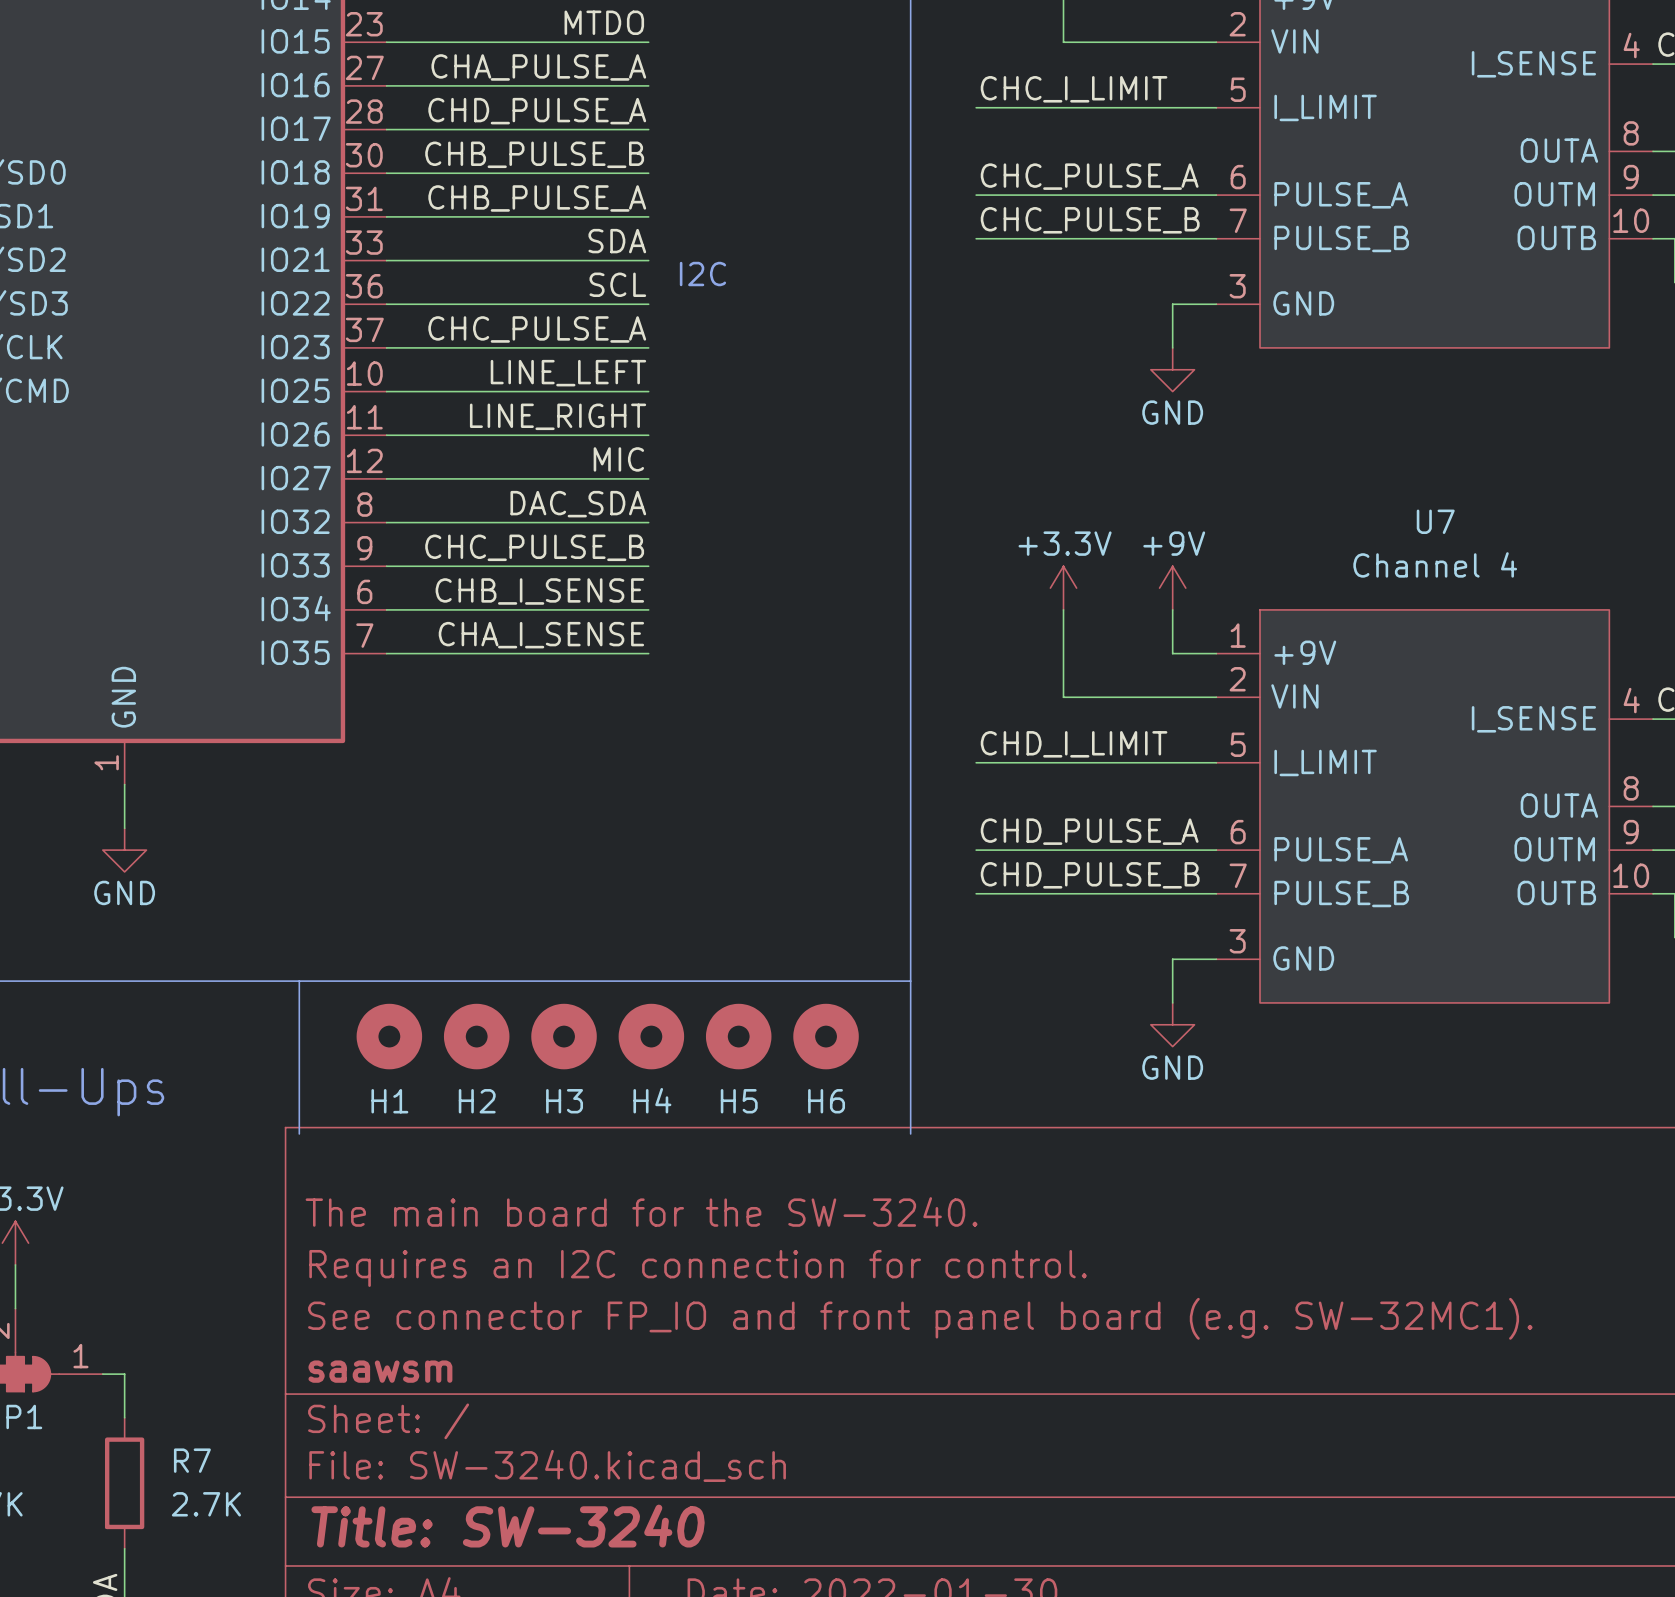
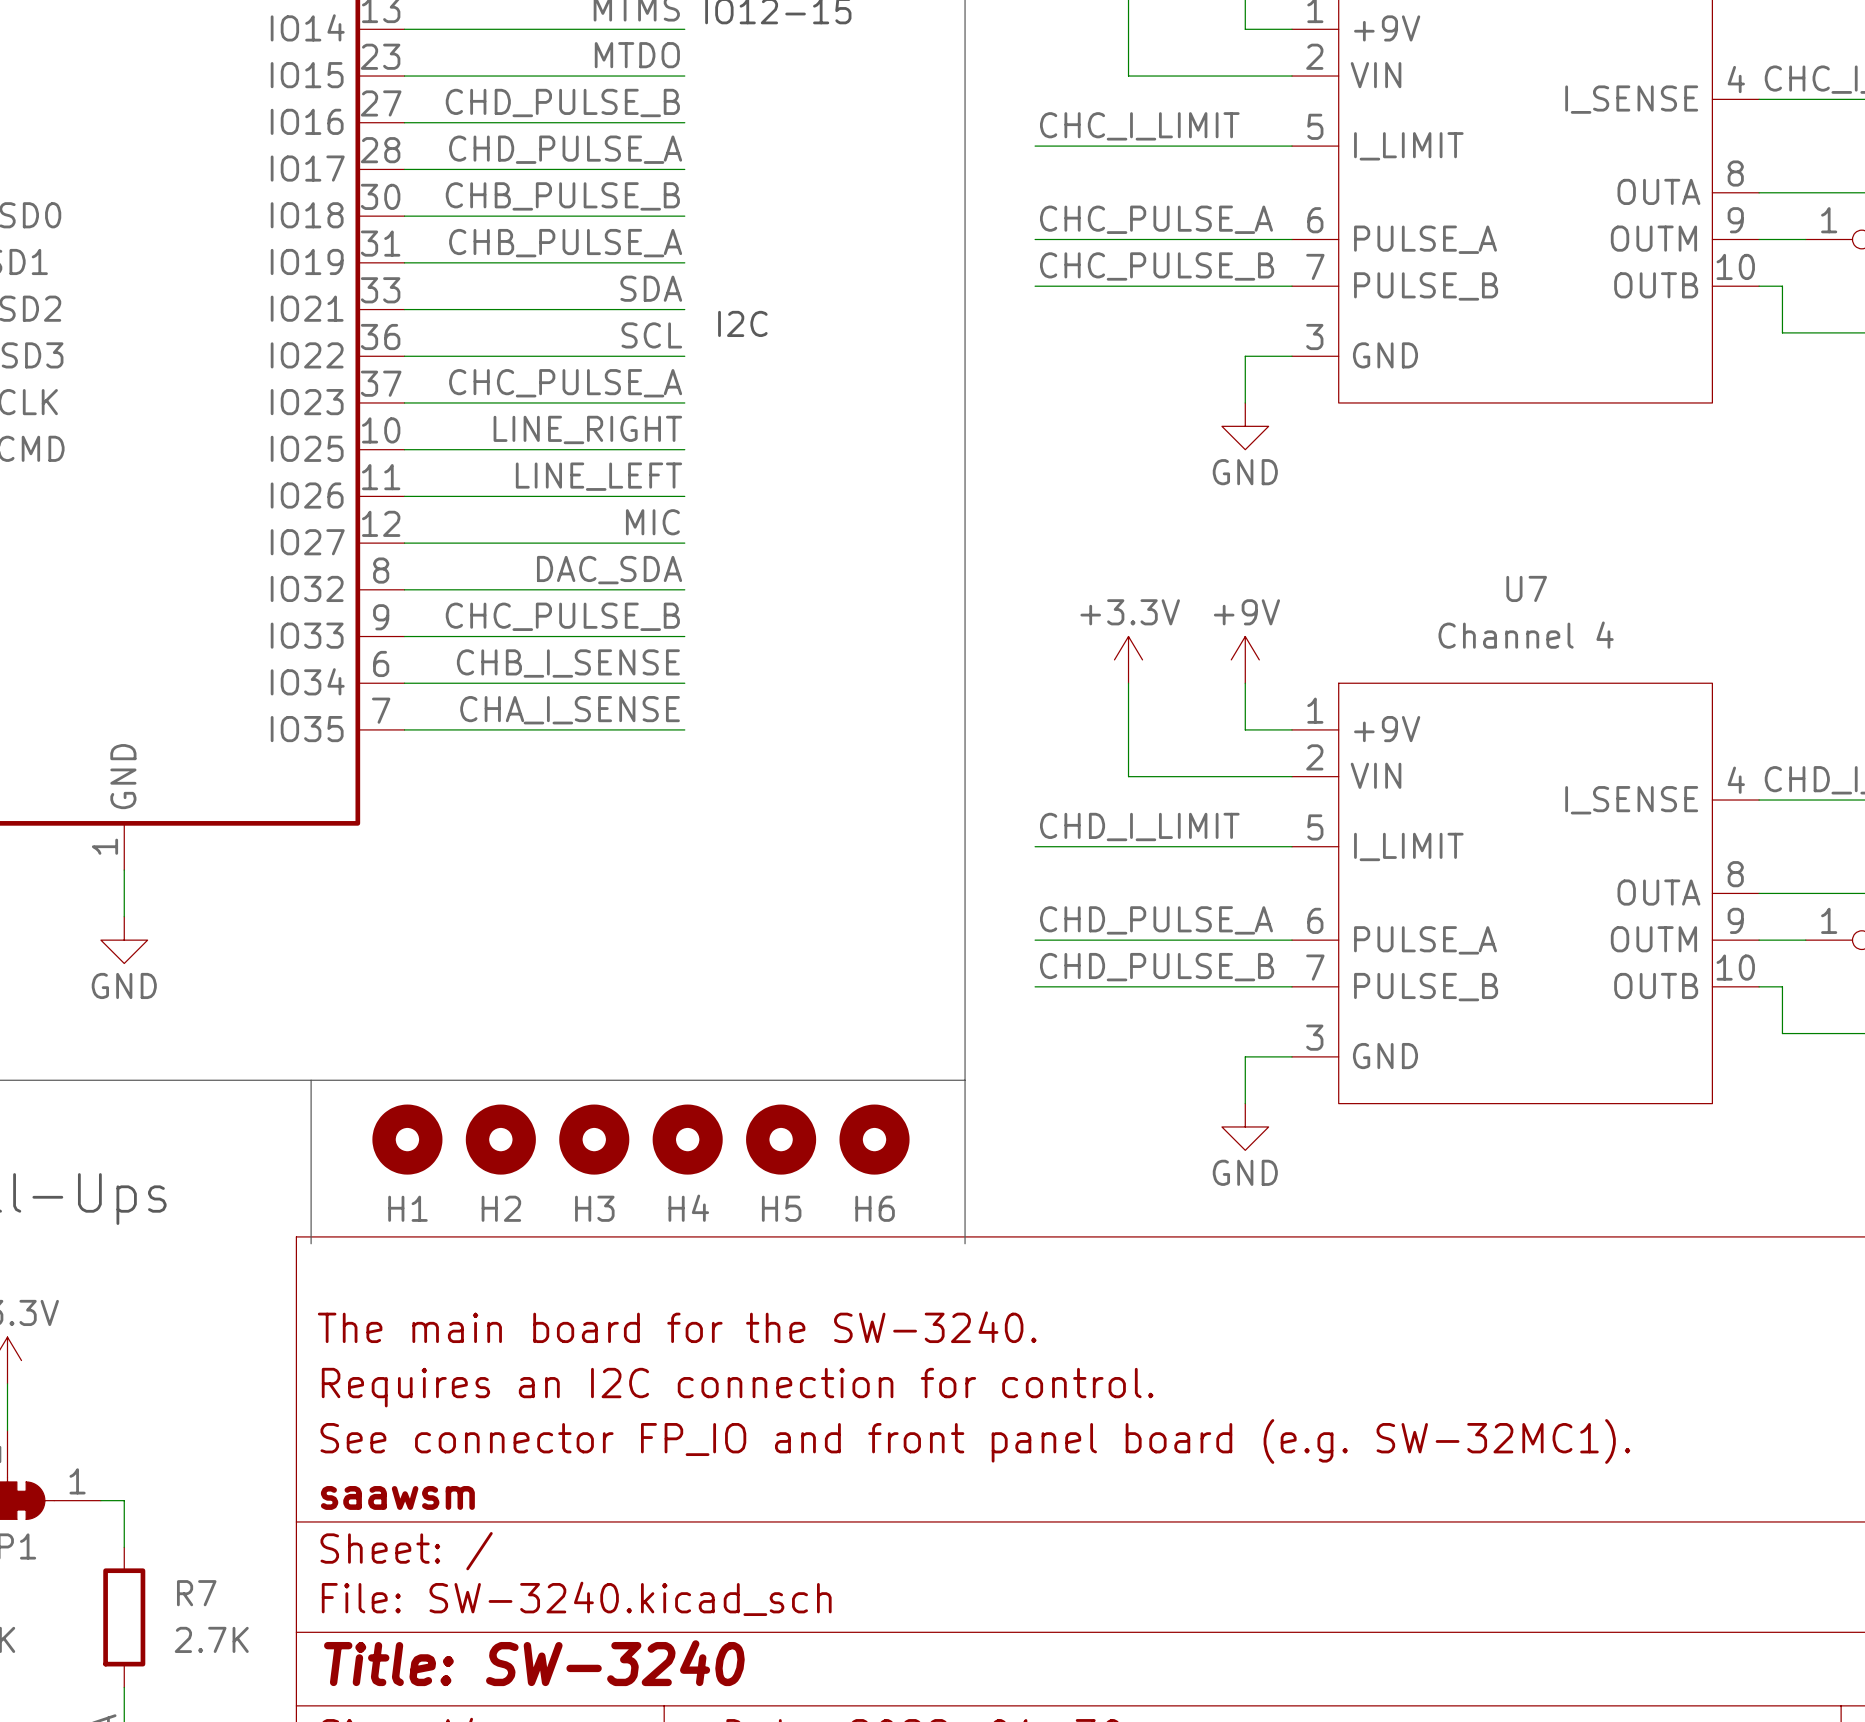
label: CHA_PULSE_A (538, 67) -> CHD_PULSE_B (562, 102)
label: LINE_LEFT (568, 373) -> LINE_RIGHT (587, 429)
label: LINE_RIGHT (558, 416) -> LINE_LEFT (598, 476)

